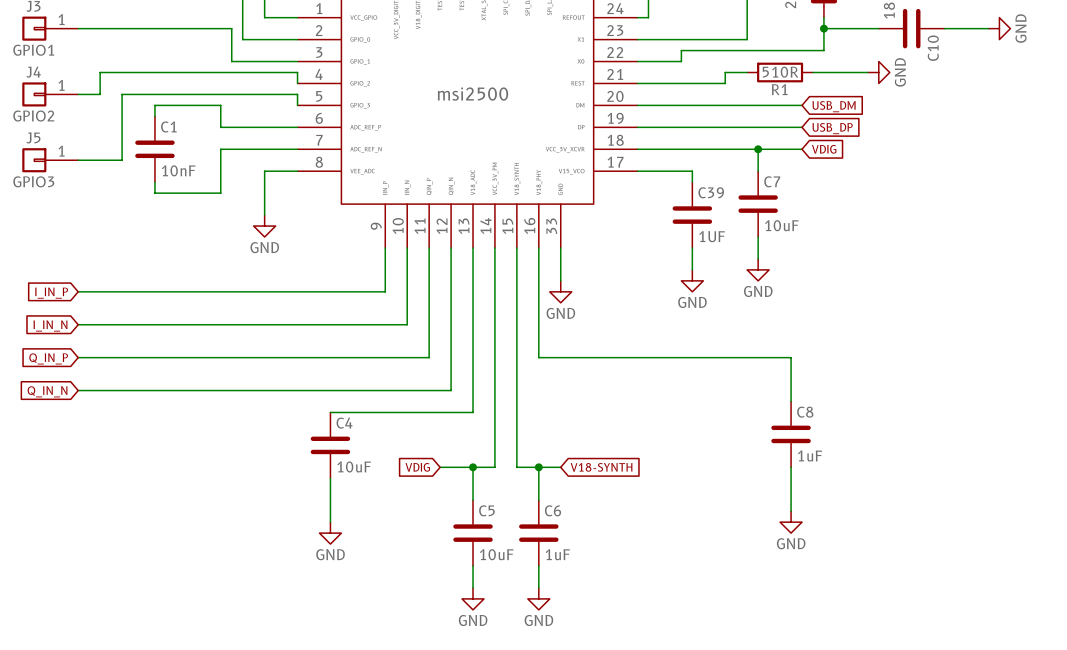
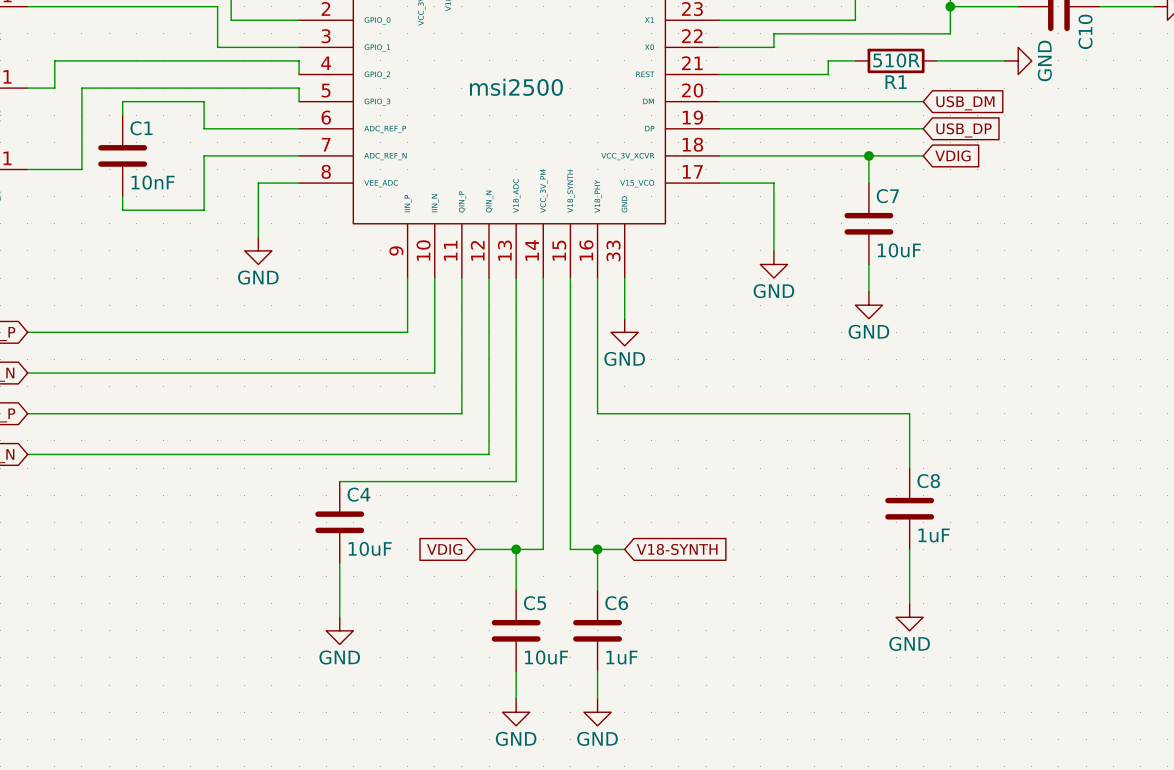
wire: (681, 171) (692, 171) (692, 182) -> (773, 183) (773, 250)
C39: 1UF (692, 215) -> none
wire: (692, 247) (692, 269) -> none
power symbol position: GND (692, 280) -> GND (773, 264)

